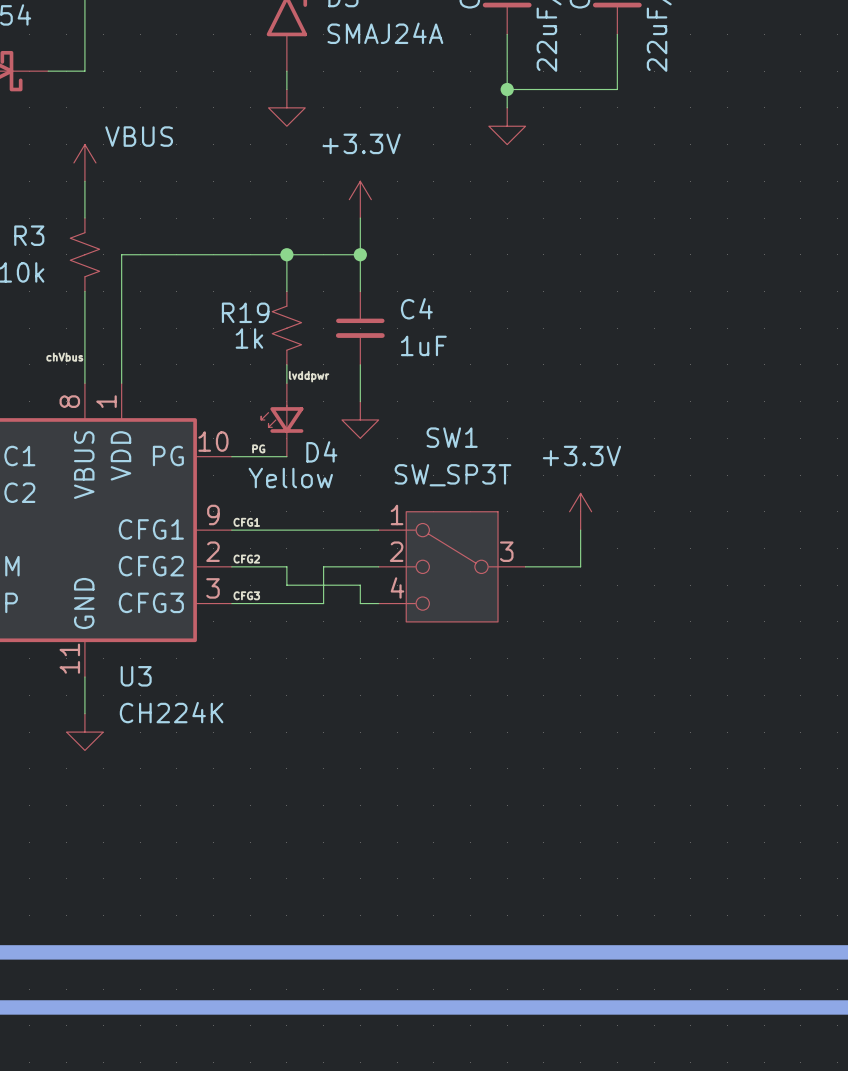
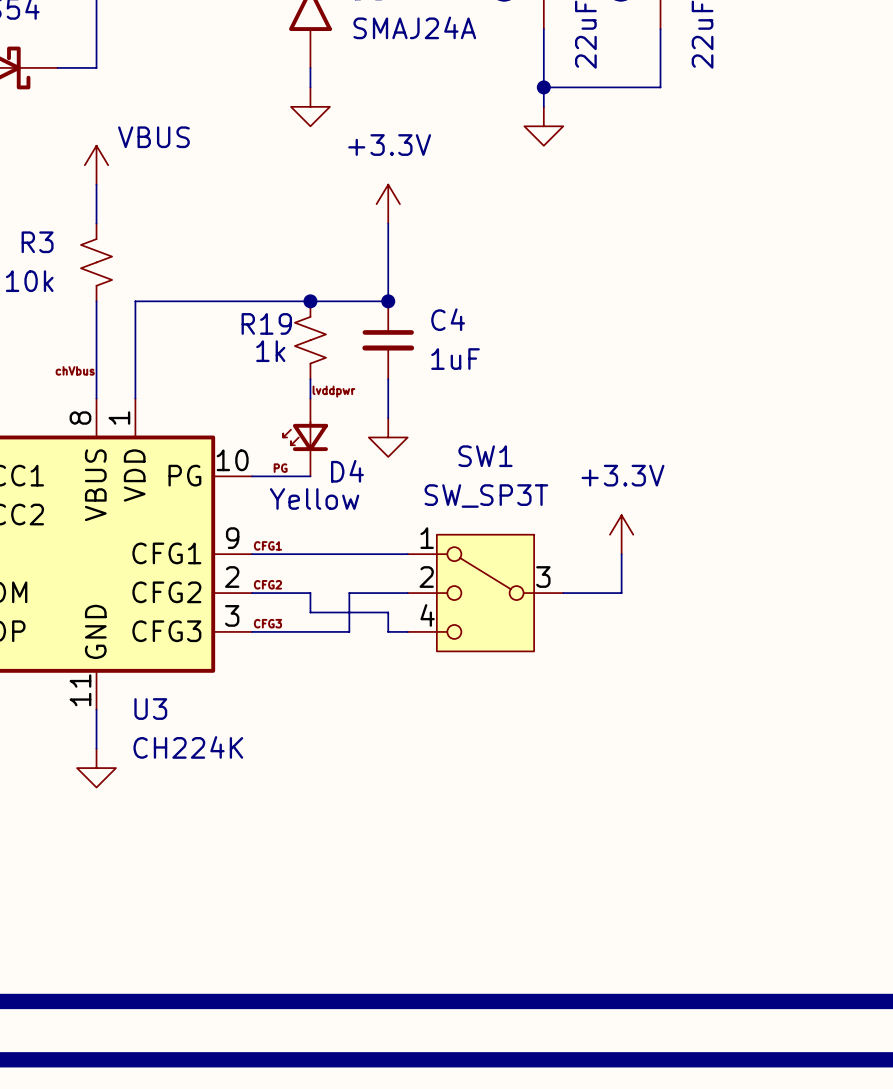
wire: (286, 254) (286, 291) -> none
junction position: (286, 254) -> (310, 301)
wire: (360, 254) (121, 254) (121, 291) -> (388, 301) (135, 301)
junction position: (360, 254) -> (388, 301)

